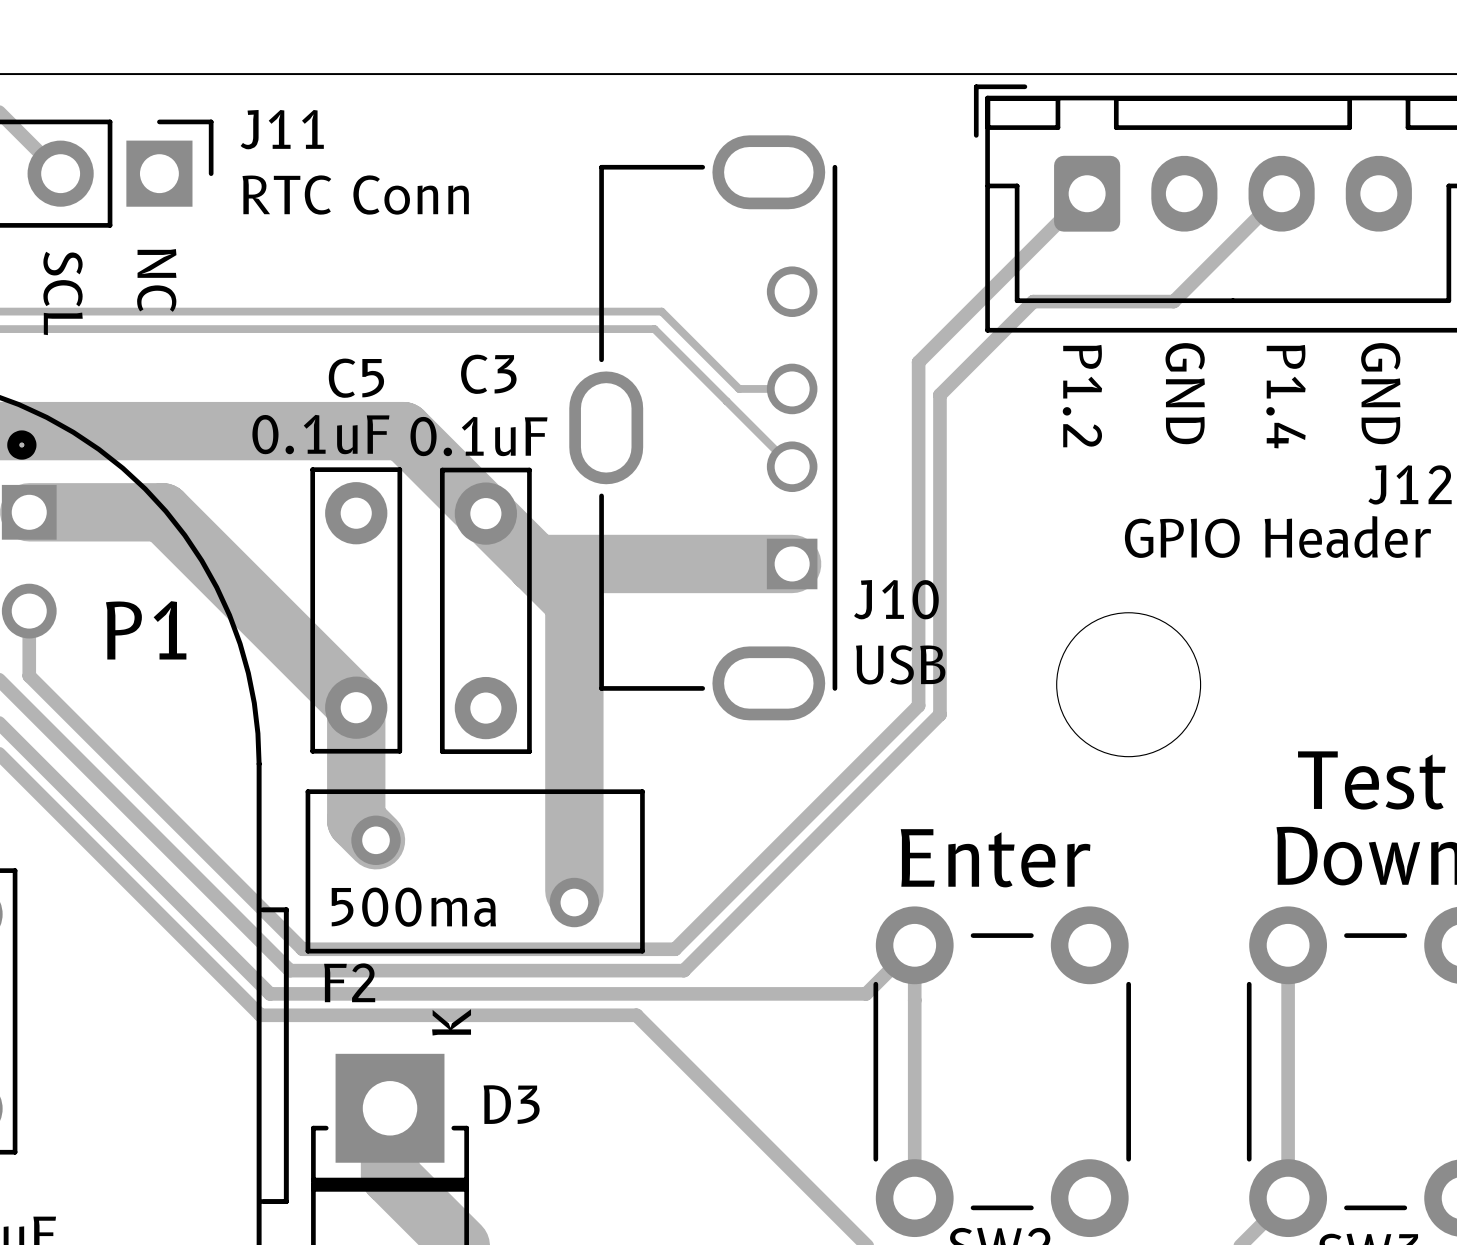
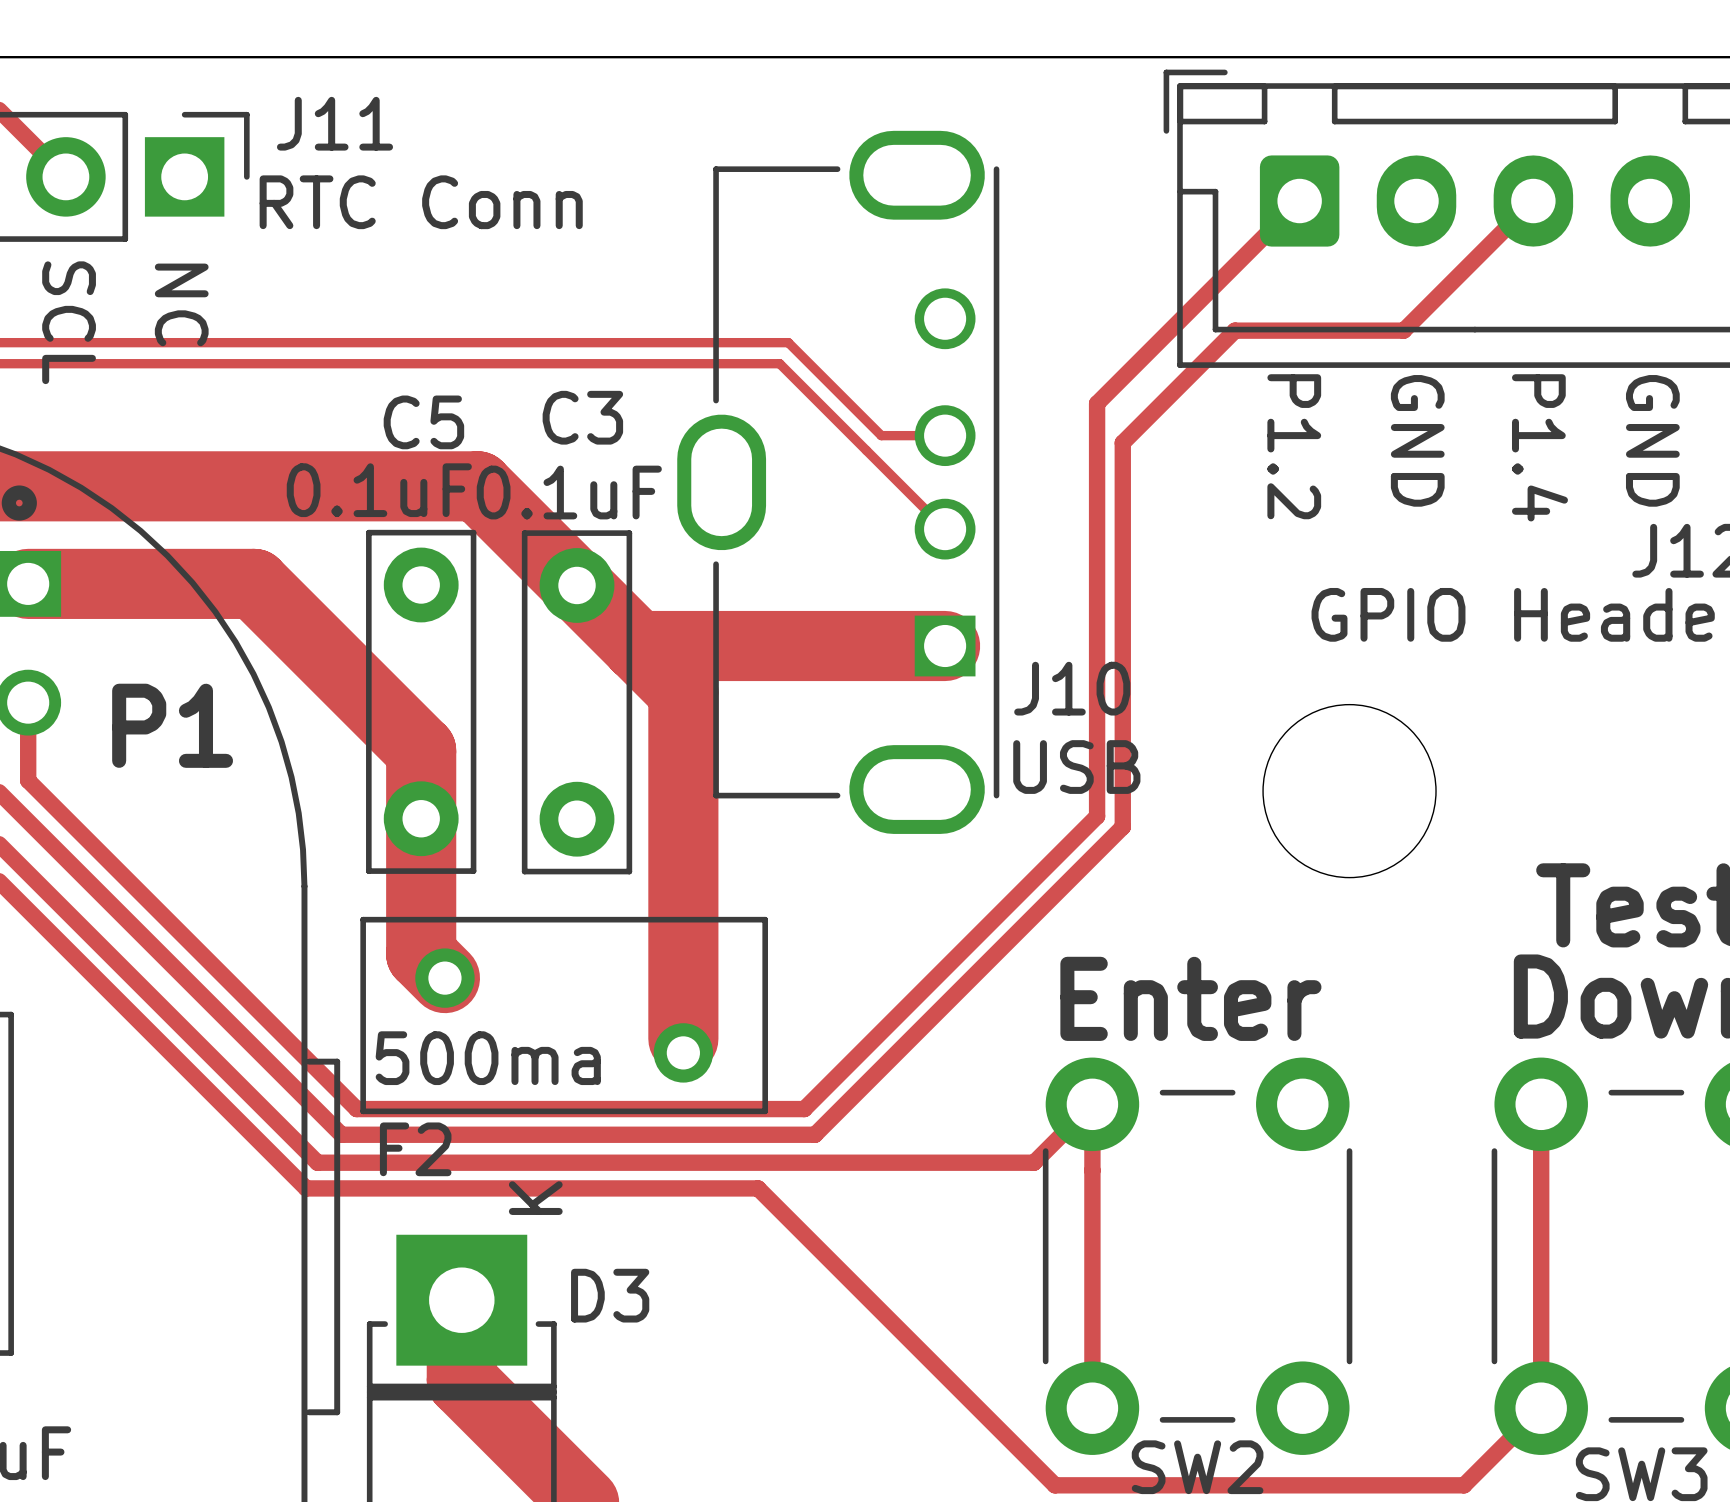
track: (162, 512) (356, 705) -> (188, 583) (254, 583) (421, 750) (421, 816)

